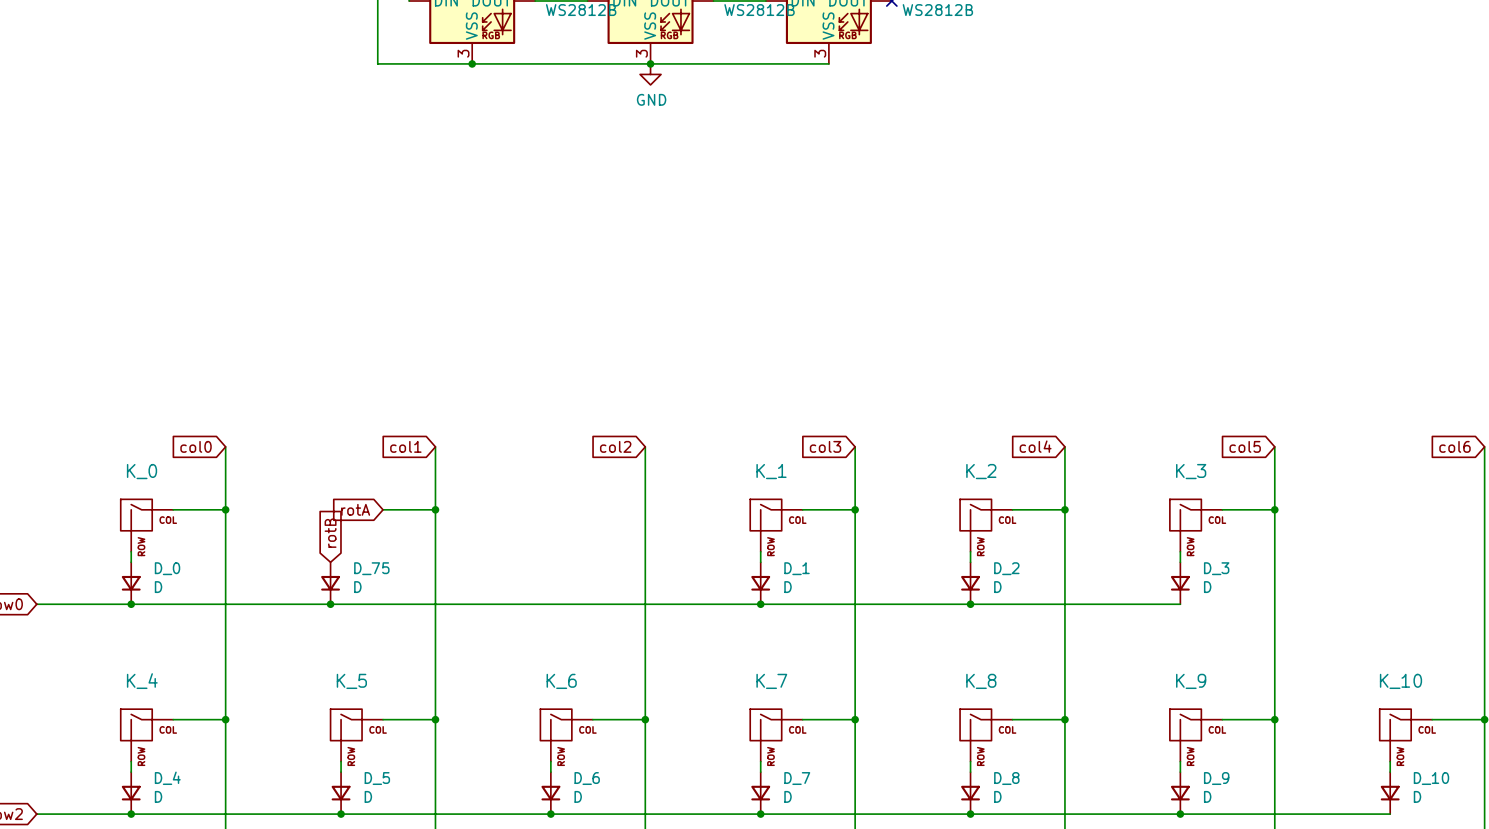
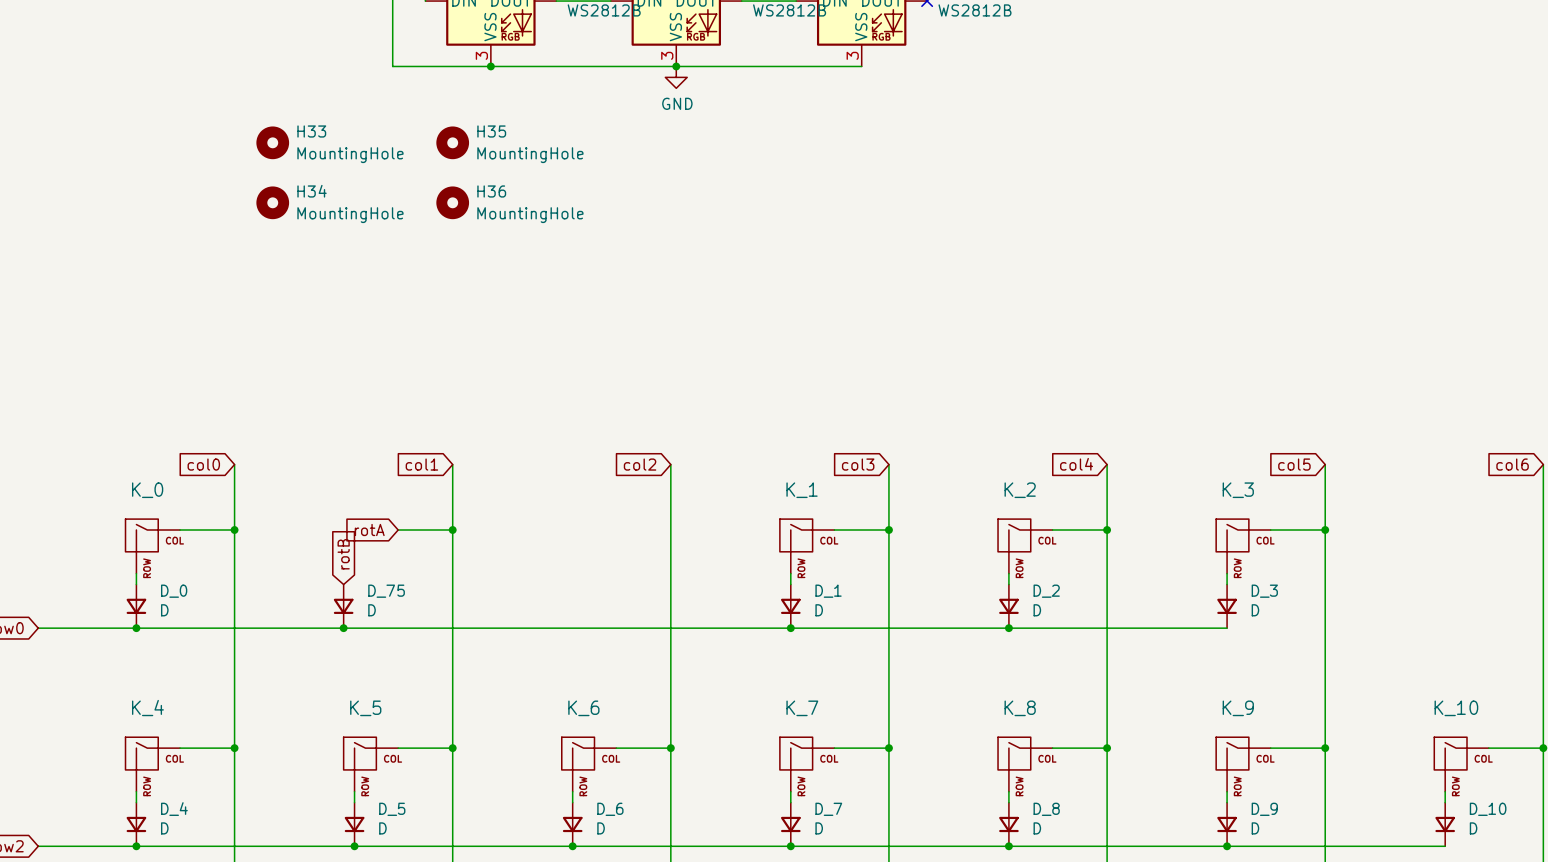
H33: none -> MountingHole (272, 142)
H35: none -> MountingHole (452, 142)
H34: none -> MountingHole (272, 202)
H36: none -> MountingHole (452, 202)

